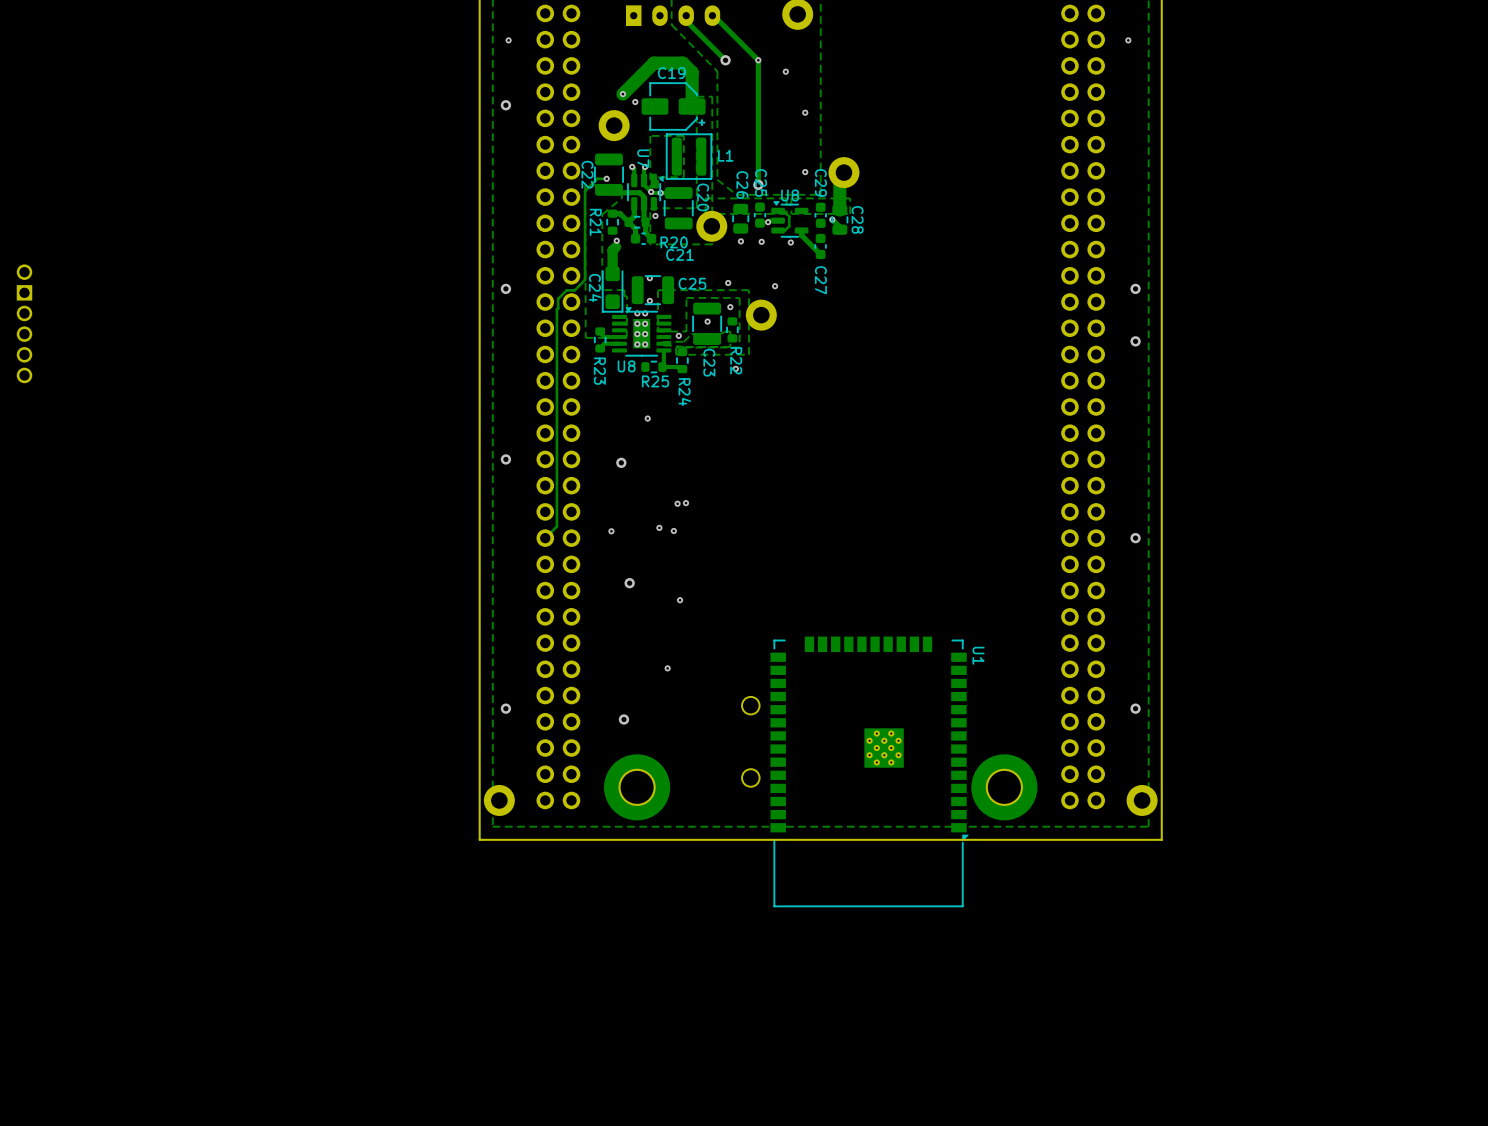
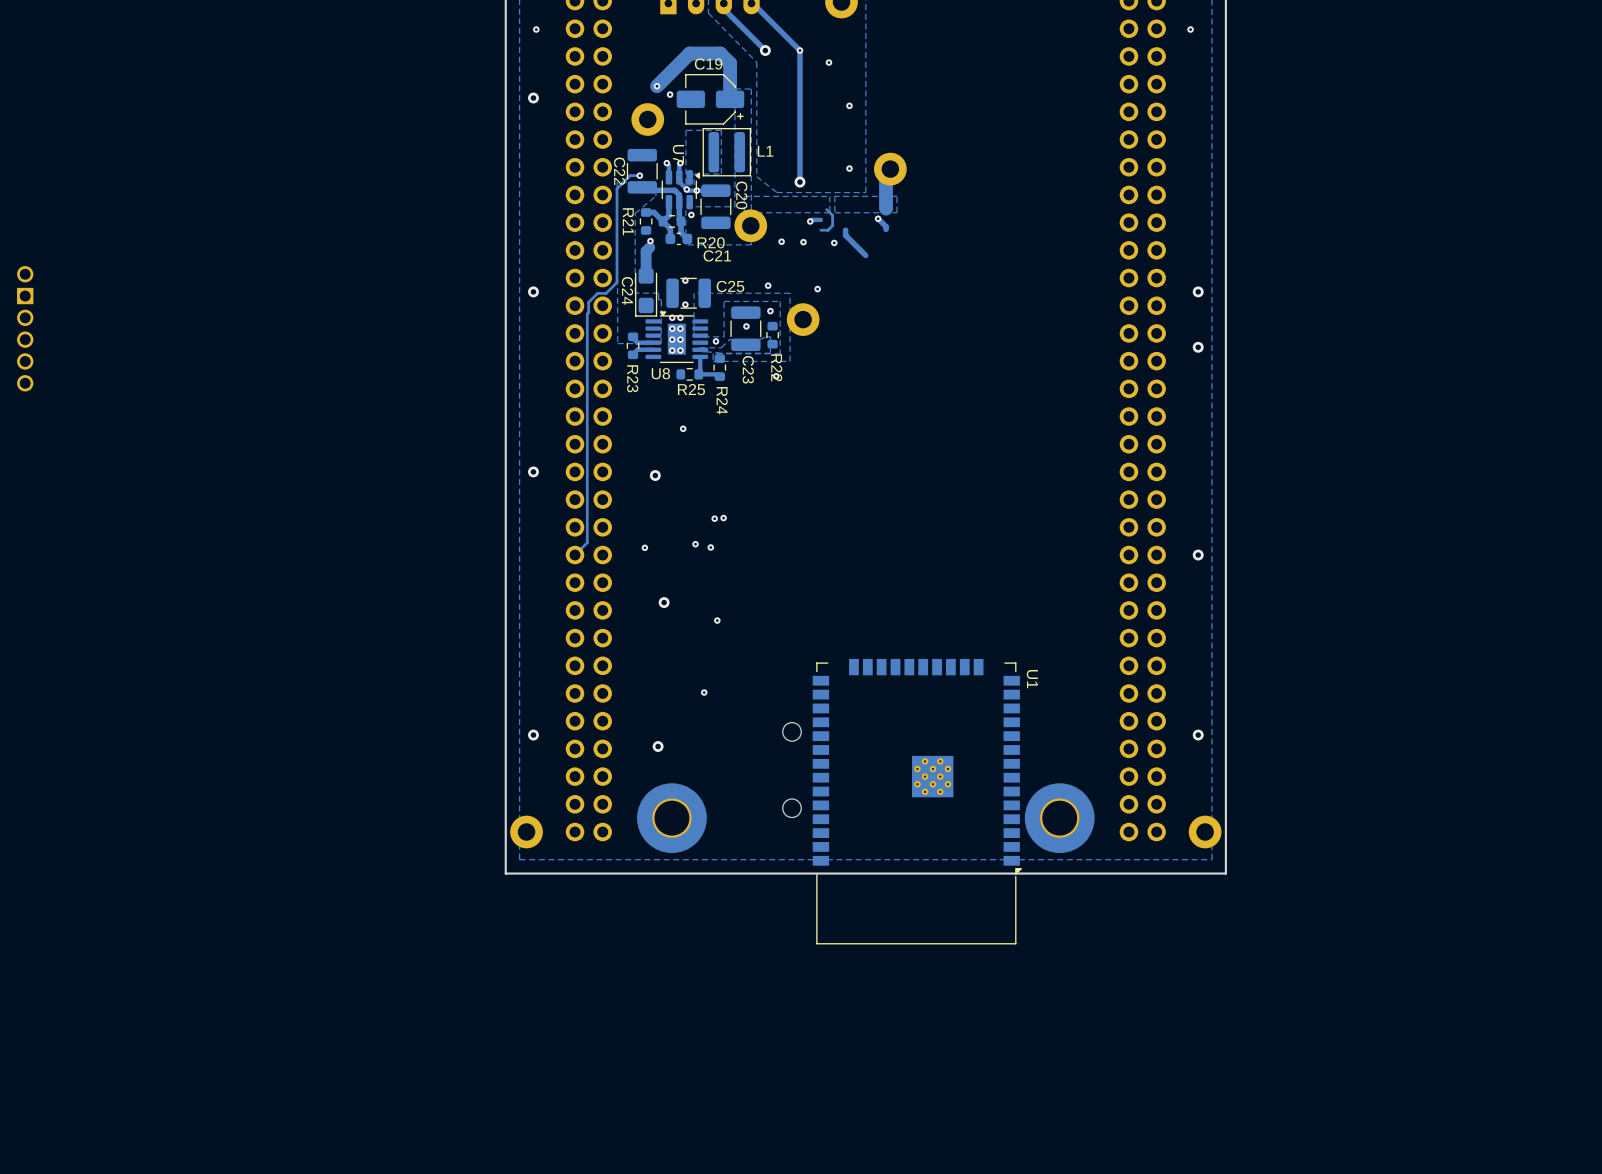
C25: (760, 215) -> none
C29: (820, 215) -> none
C26: (740, 218) -> none
U8: (789, 219) -> none
C28: (839, 219) -> none
C27: (820, 246) -> none

